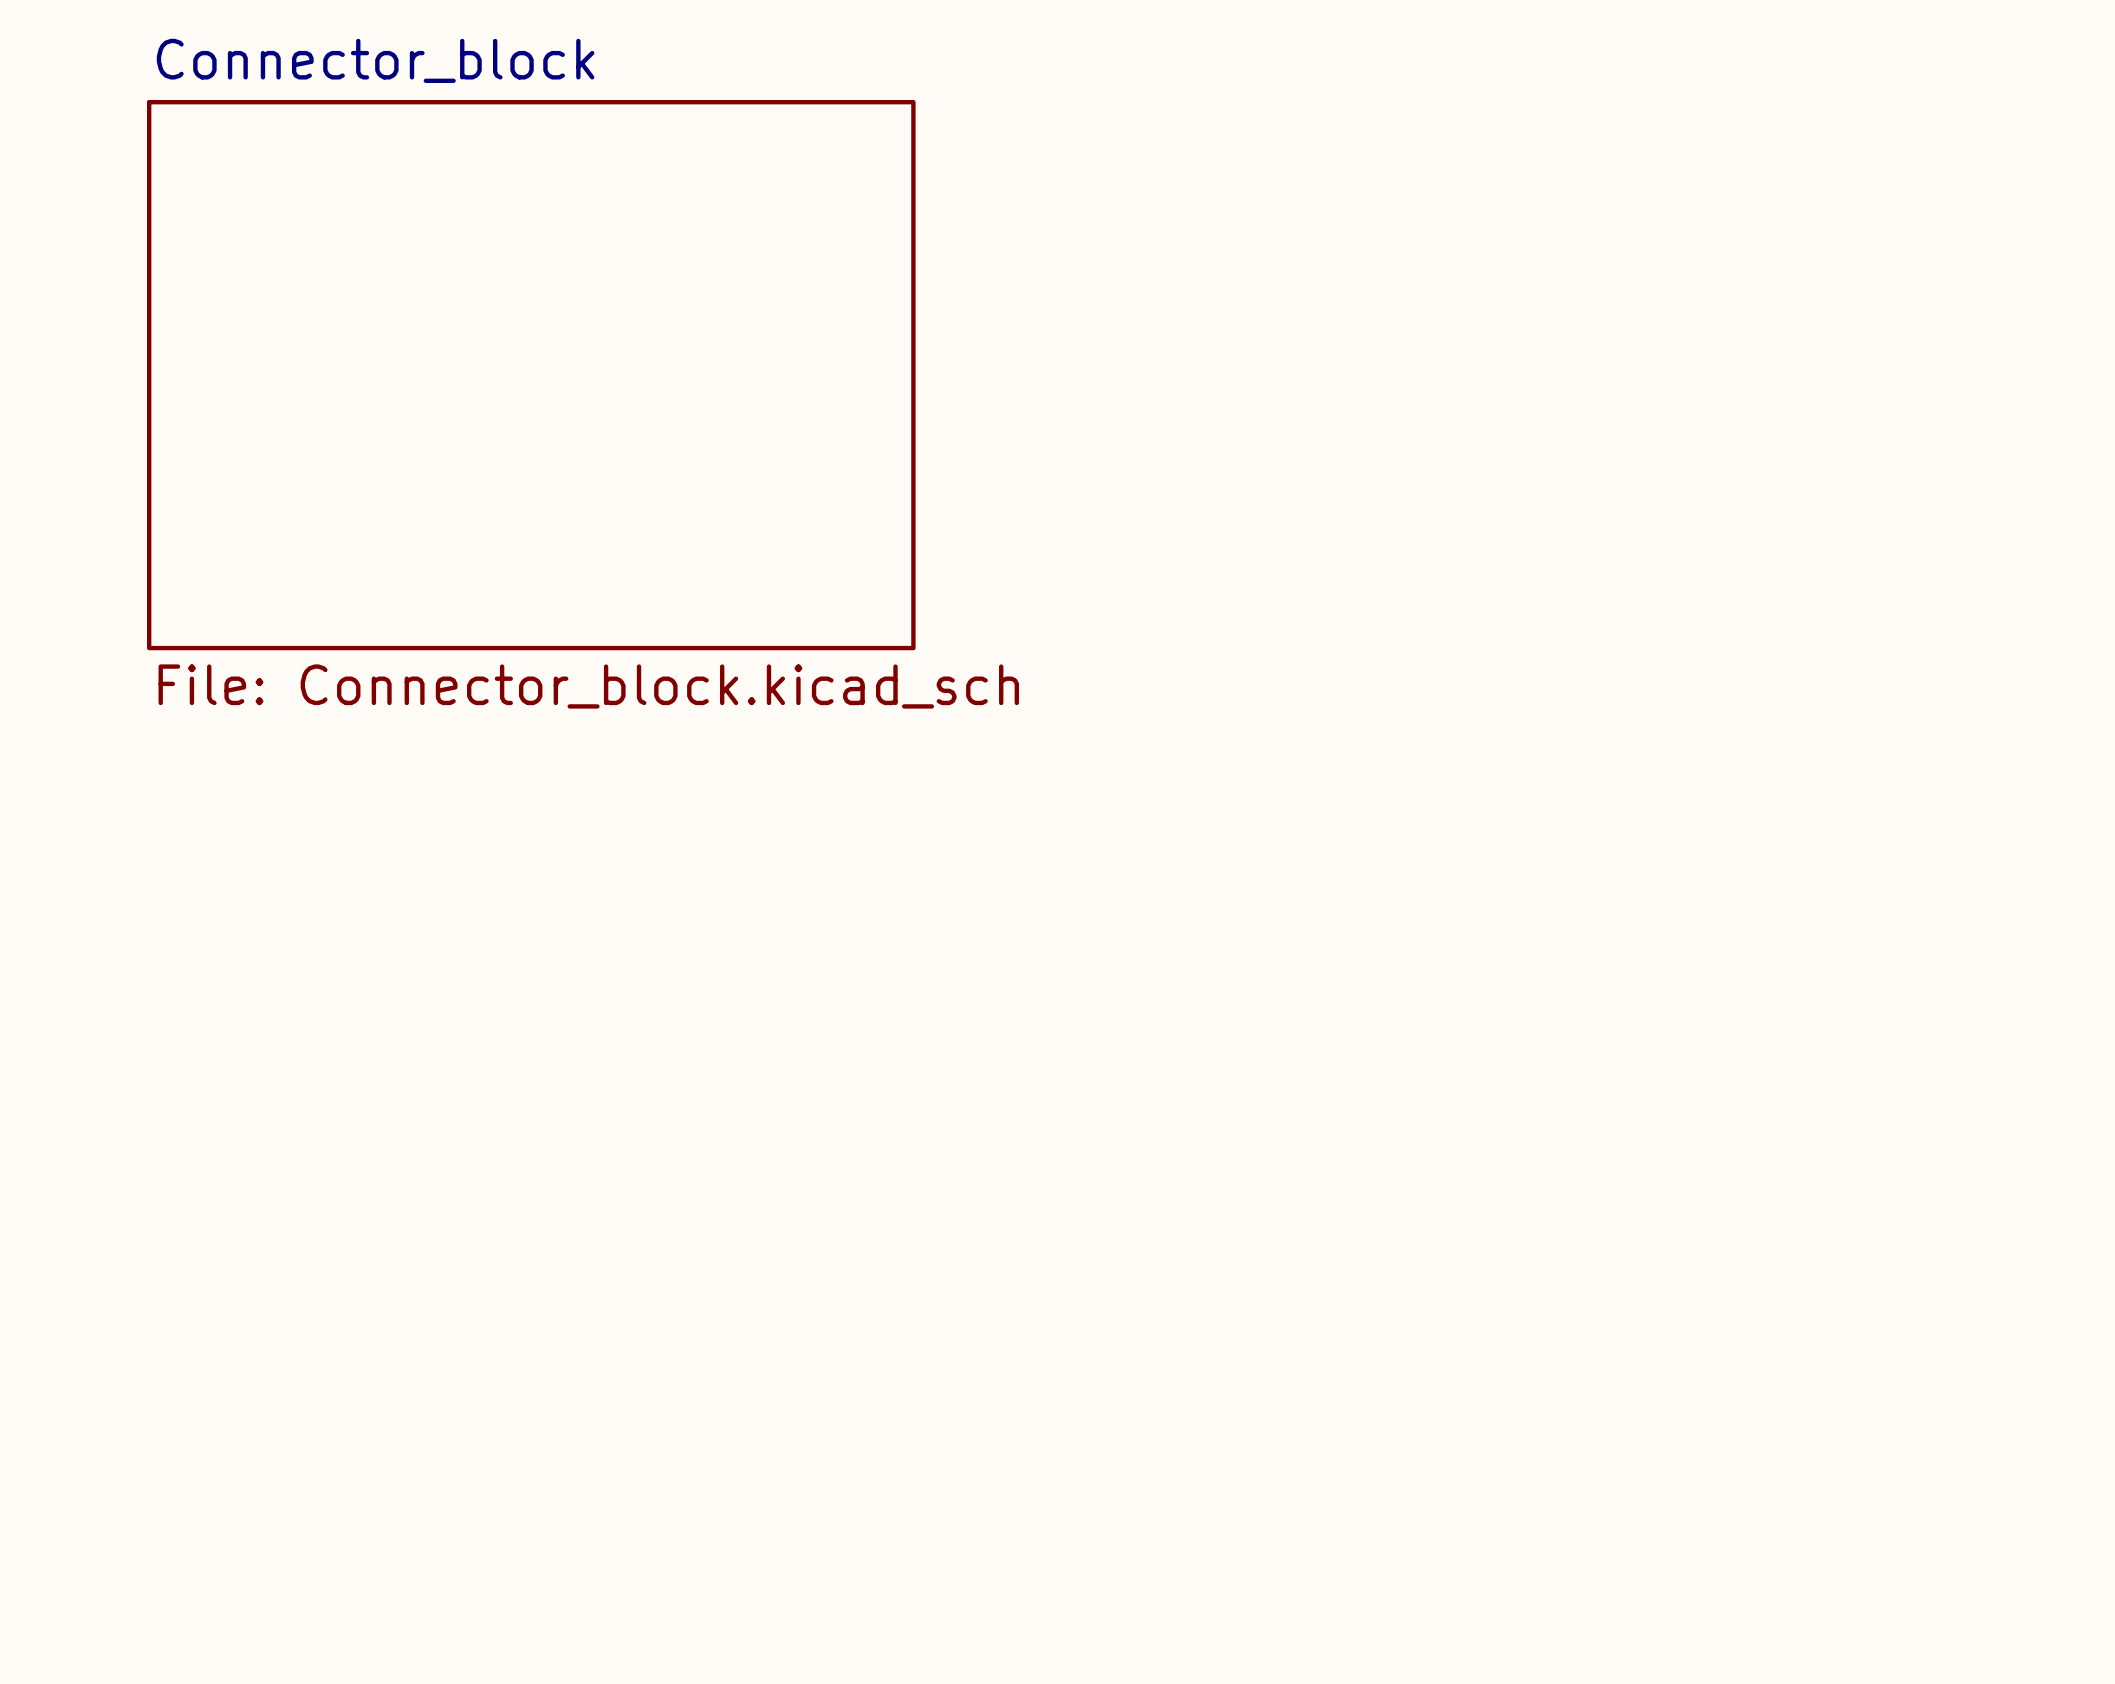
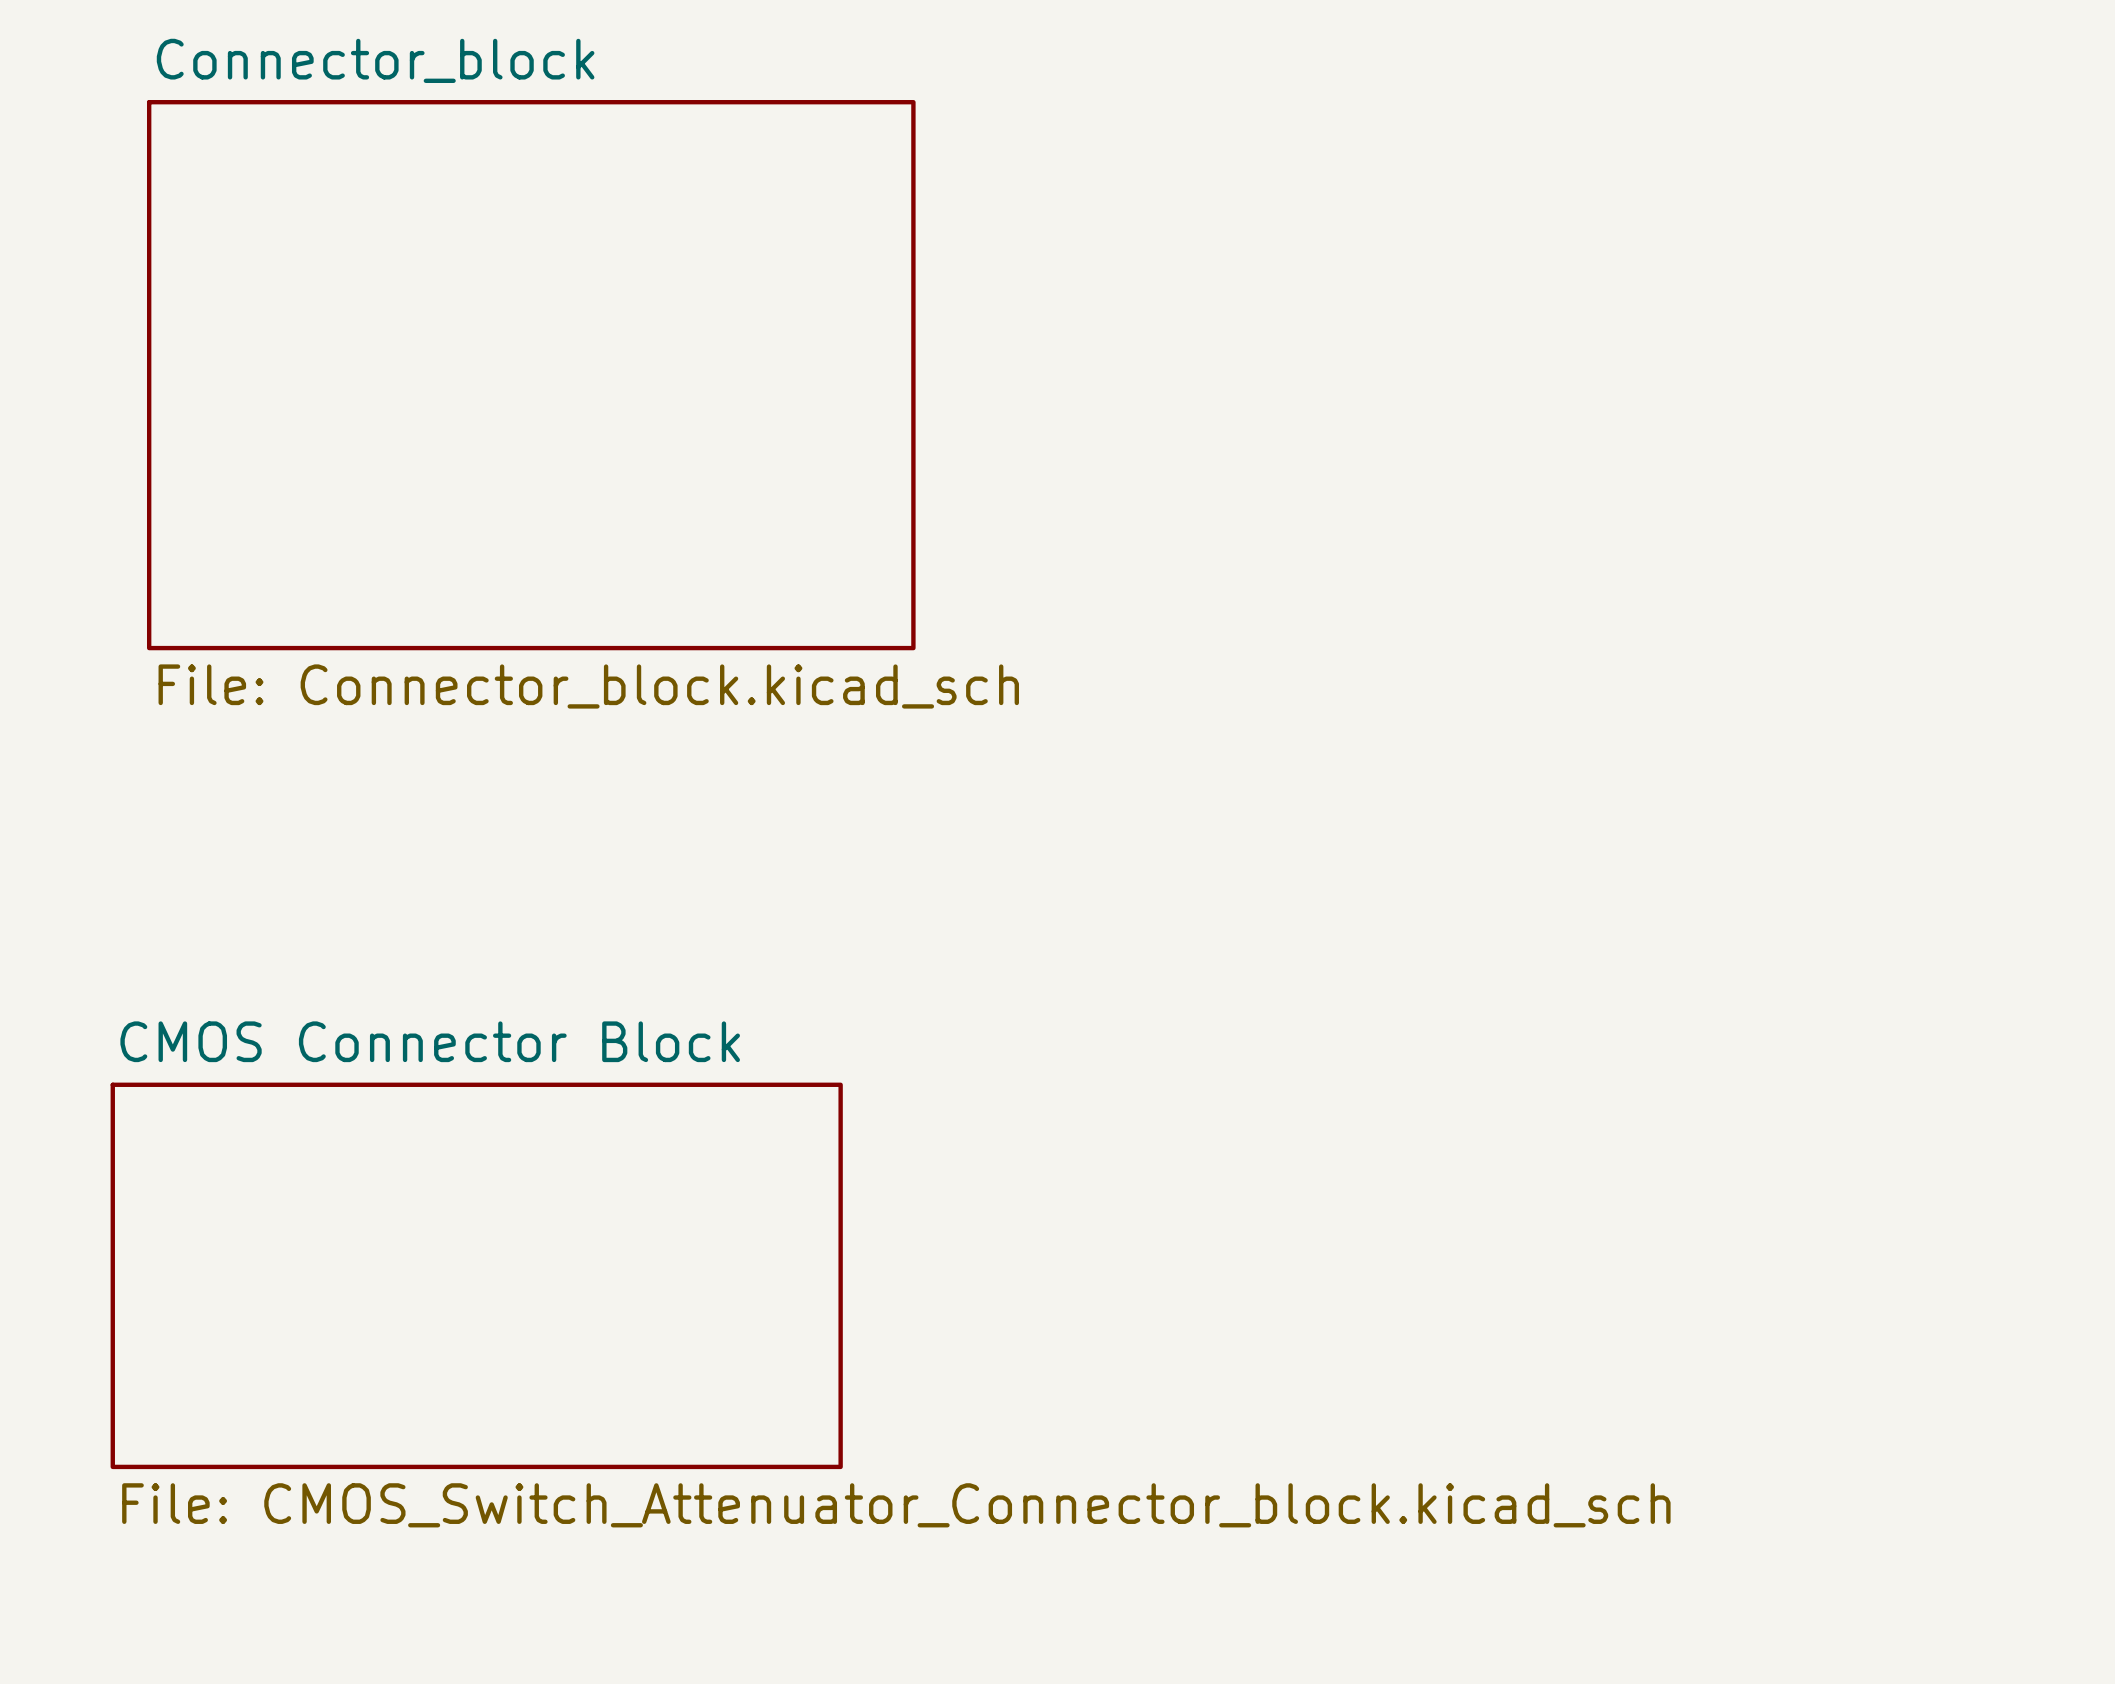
sheet CMOS Connector Block: none -> File: CMOS_Switch_Attenuator_Connector_block.kicad_sch (476, 1275)

